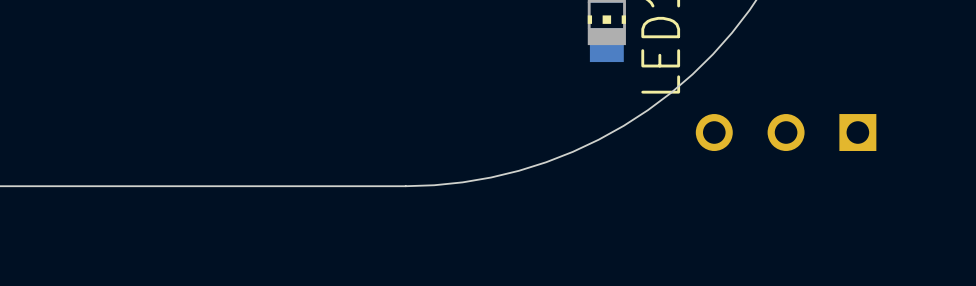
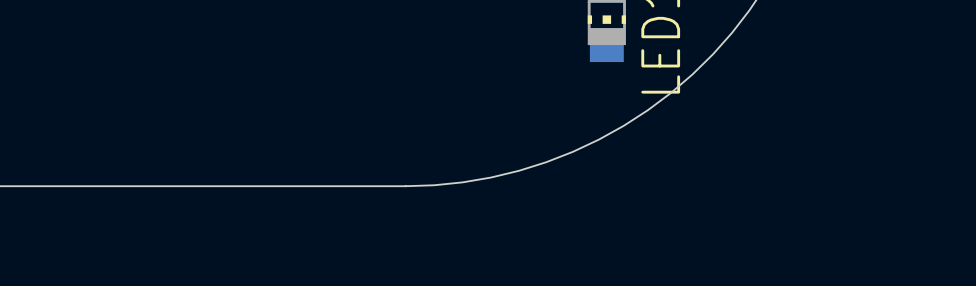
part: (786, 132) -> none

